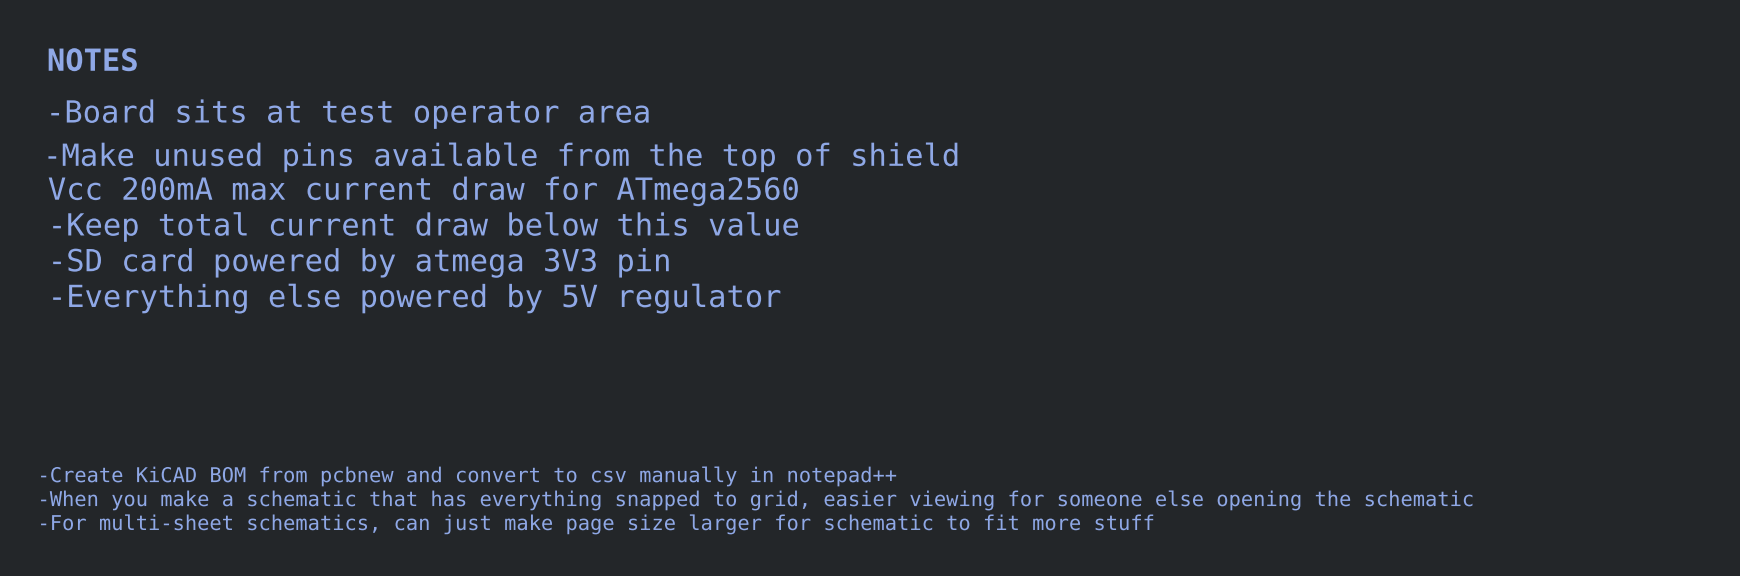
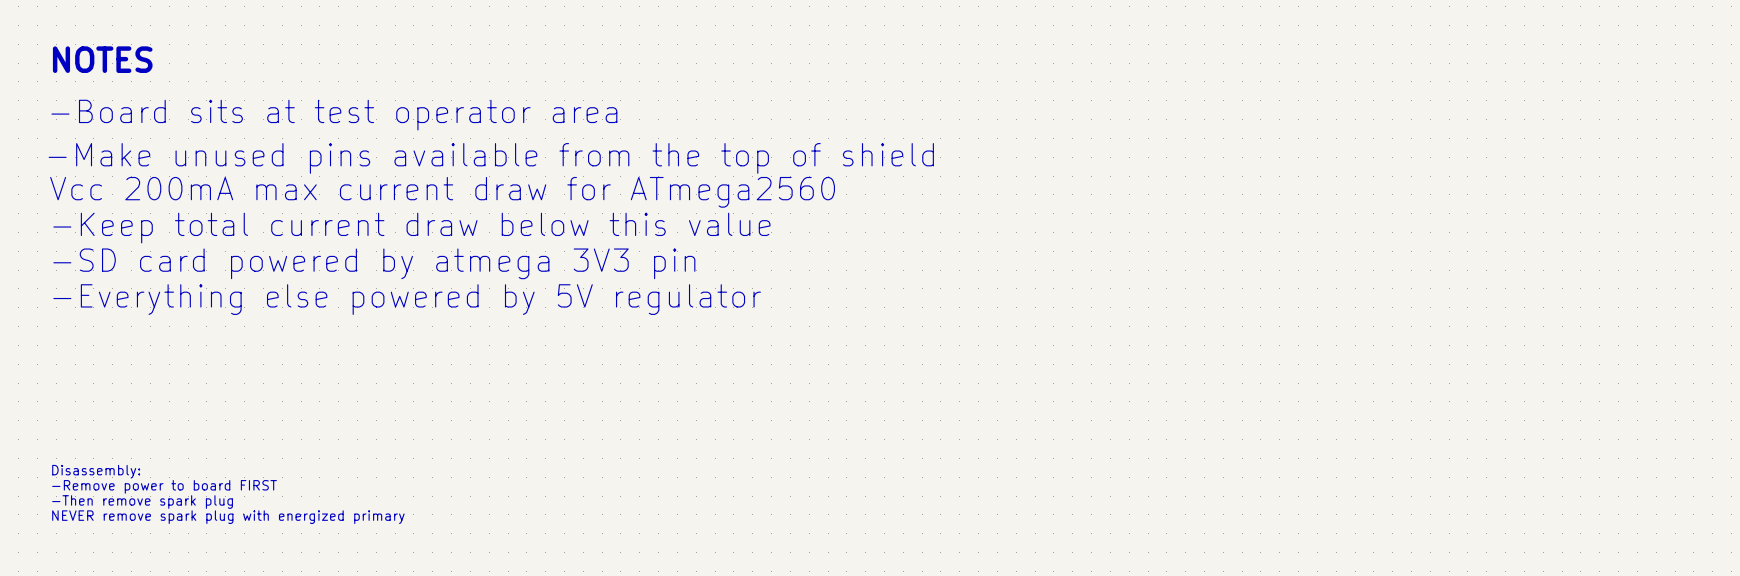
text: none -> Disassembly: (96, 471)
text: -Create KiCAD BOM from pcbnew and convert to csv manually in notepad++ (468, 476) -> none
text: none -> -Remove power to board FIRST (164, 486)
text: -When you make a schematic that has everything snapped to grid, easier viewing for someone else opening the schematic (756, 500) -> none
text: none -> -Then remove spark plug (142, 502)
text: none -> NEVER remove spark plug with energized primary (228, 517)
text: -For multi-sheet schematics, can just make page size larger for schematic to fit more stuff (597, 524) -> none

